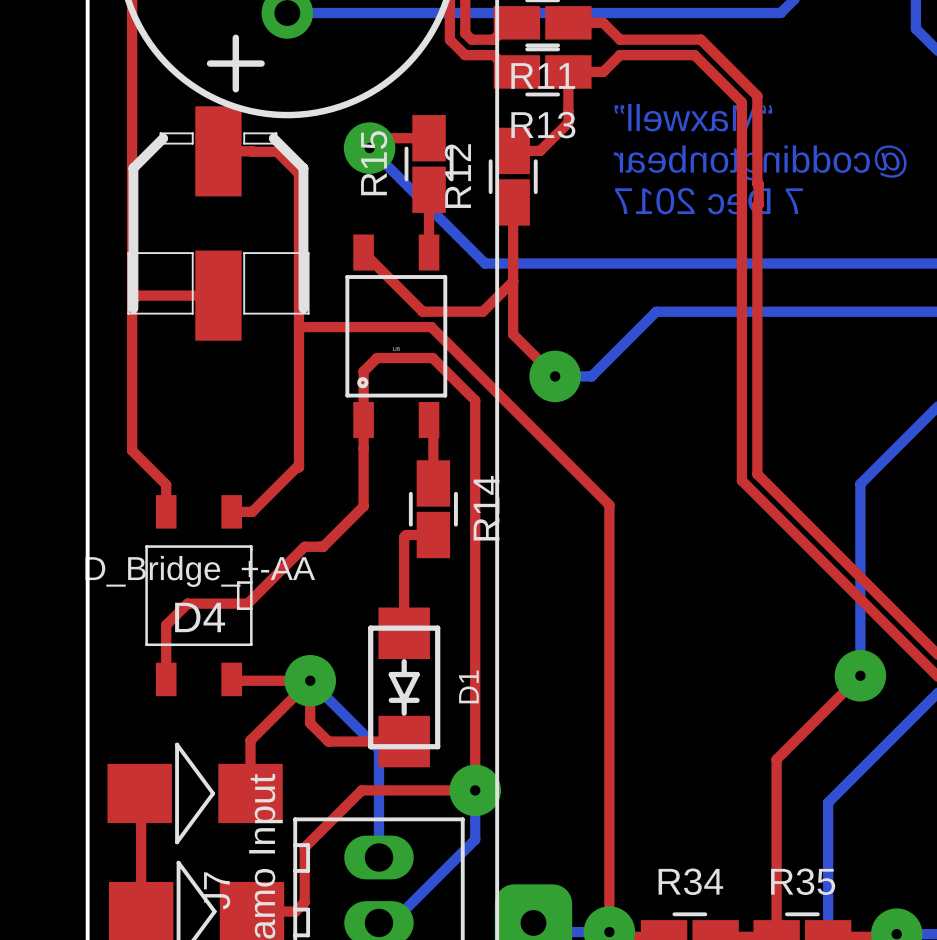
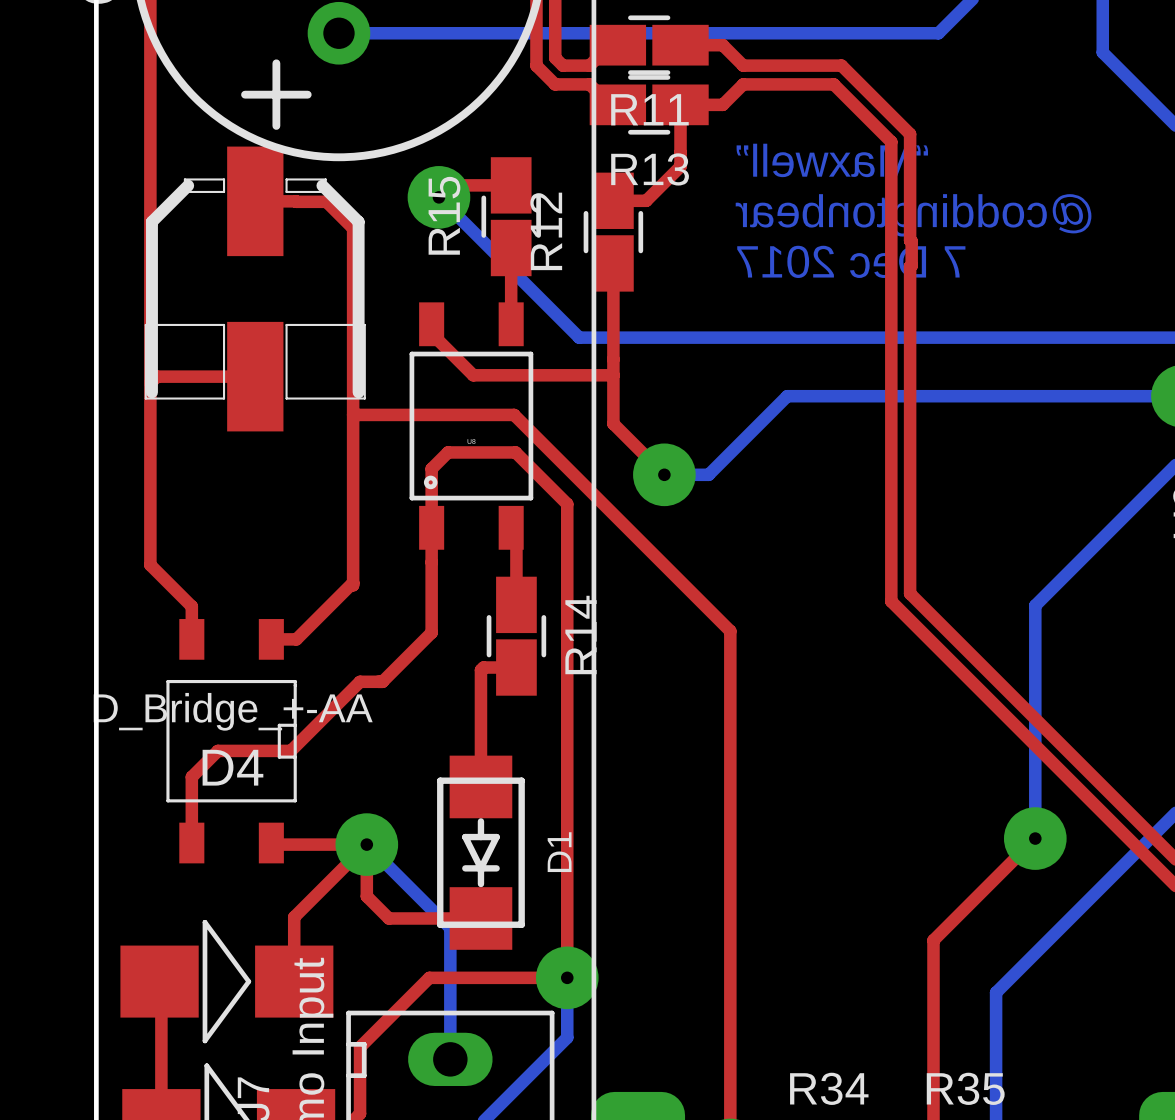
top track: (363, 252) (422, 311) (482, 311) (513, 281) -> (431, 324) (431, 333) (473, 375) (613, 375)

